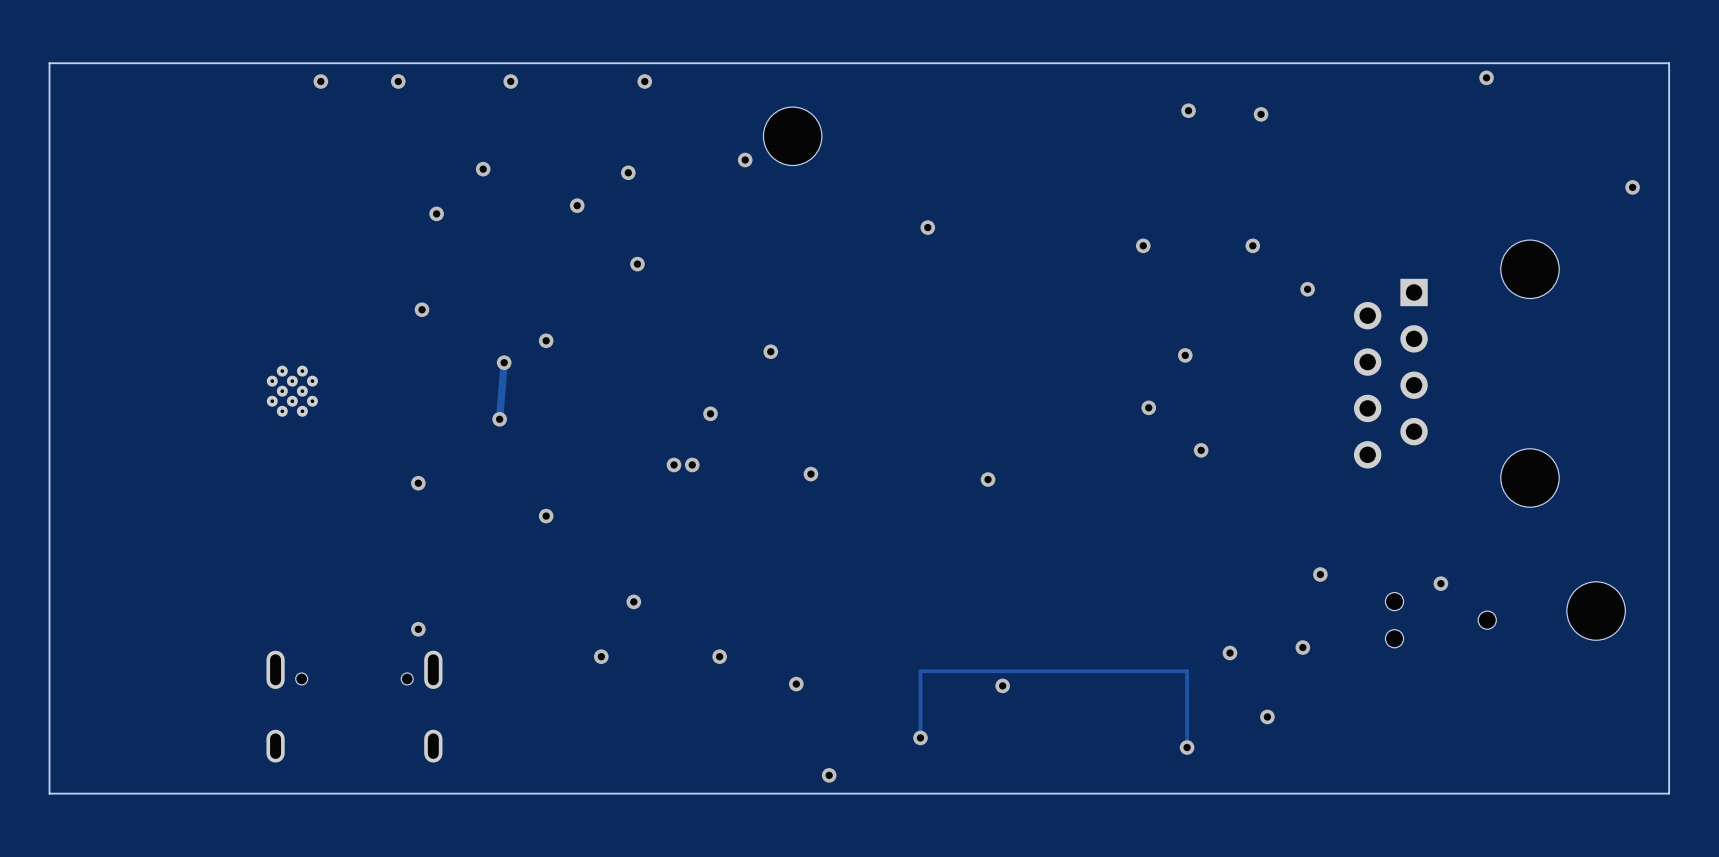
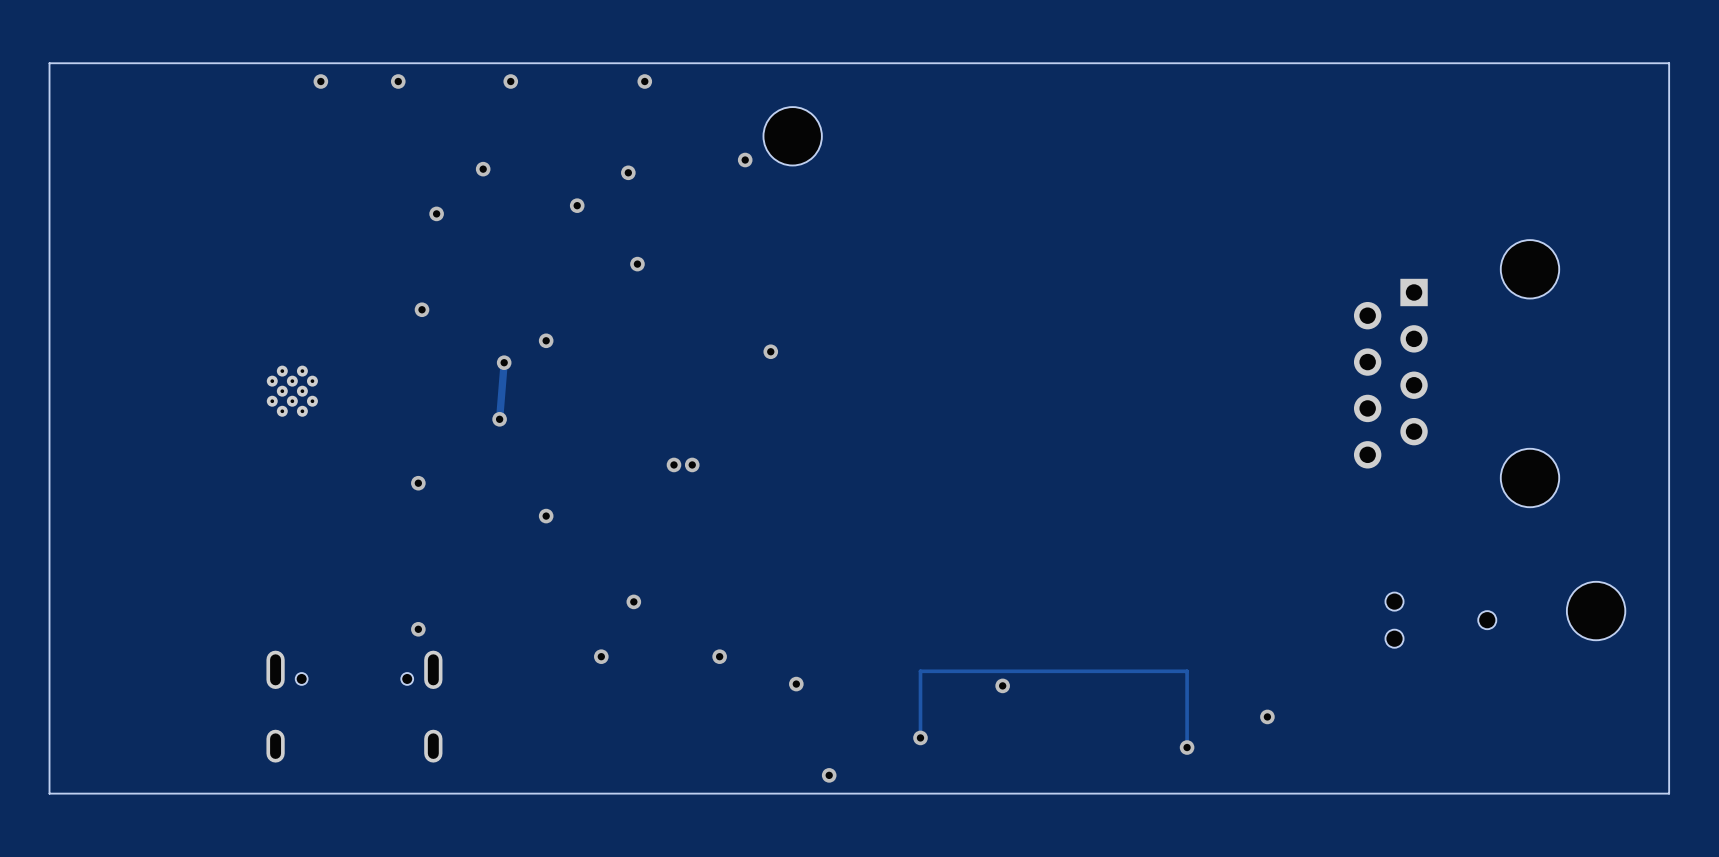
via: (1486, 77) -> none
via: (1188, 110) -> none
via: (1261, 114) -> none
via: (1632, 187) -> none
via: (927, 227) -> none
via: (1143, 245) -> none
via: (1252, 245) -> none
via: (1307, 289) -> none
via: (1185, 355) -> none
via: (1148, 407) -> none
via: (710, 413) -> none
via: (1201, 450) -> none
via: (810, 474) -> none
via: (988, 479) -> none
via: (1320, 574) -> none
via: (1440, 583) -> none
via: (1302, 647) -> none
via: (1229, 653) -> none

